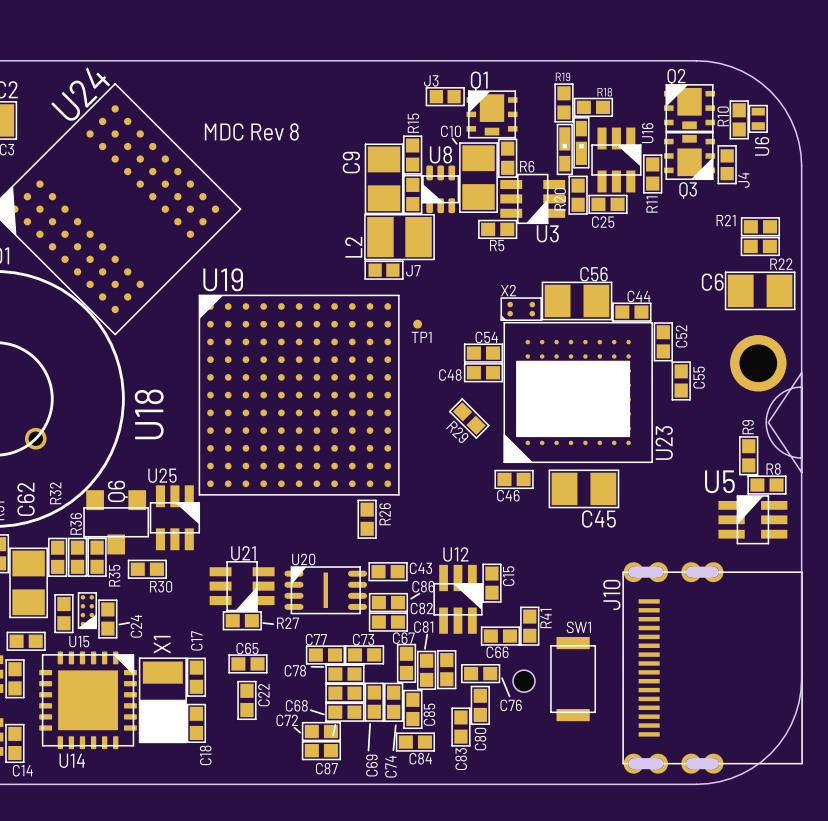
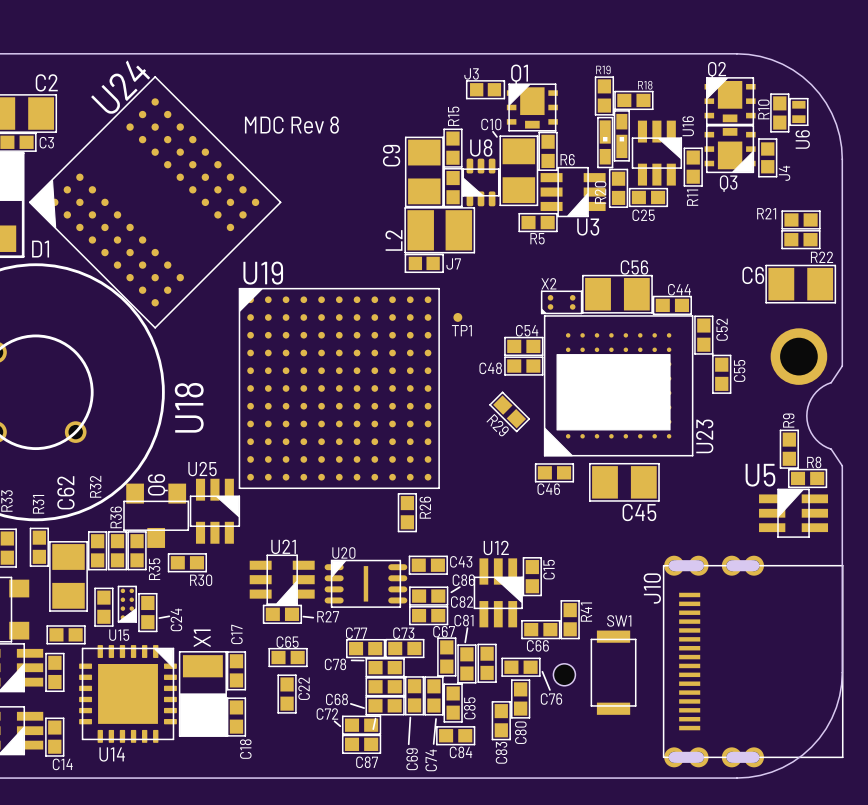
drawing shape: [766, 372, 802, 473] -> [806, 366, 843, 466]

